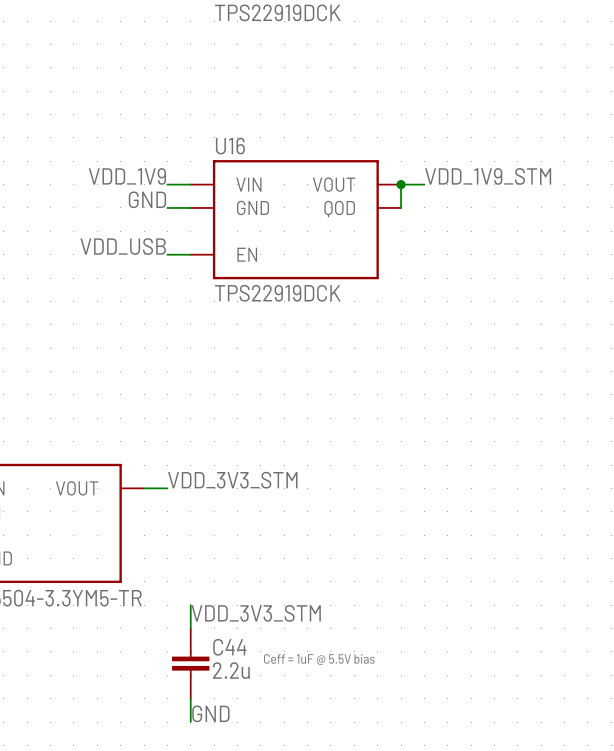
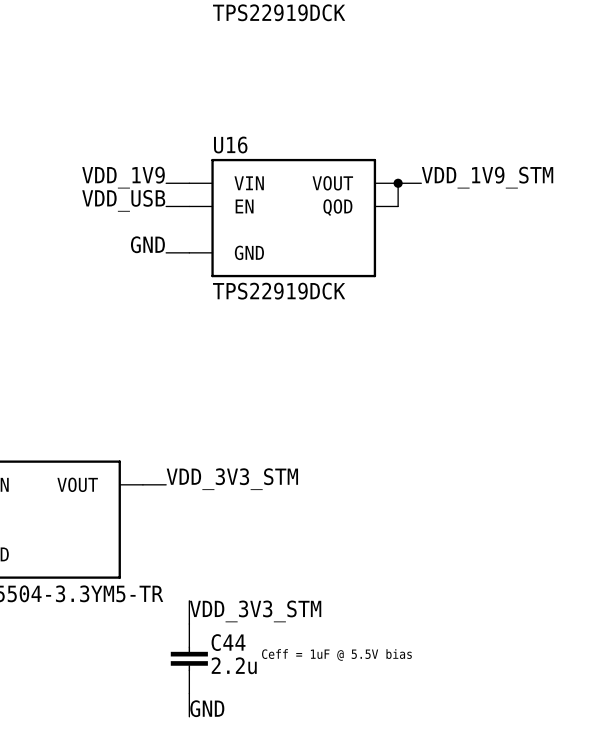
label: GND (147, 199) -> VDD_USB (123, 200)
U16 pin name: GND (252, 207) -> EN (244, 206)
label: VDD_USB (123, 246) -> GND (147, 244)
U16 pin name: EN (247, 254) -> GND (249, 252)

